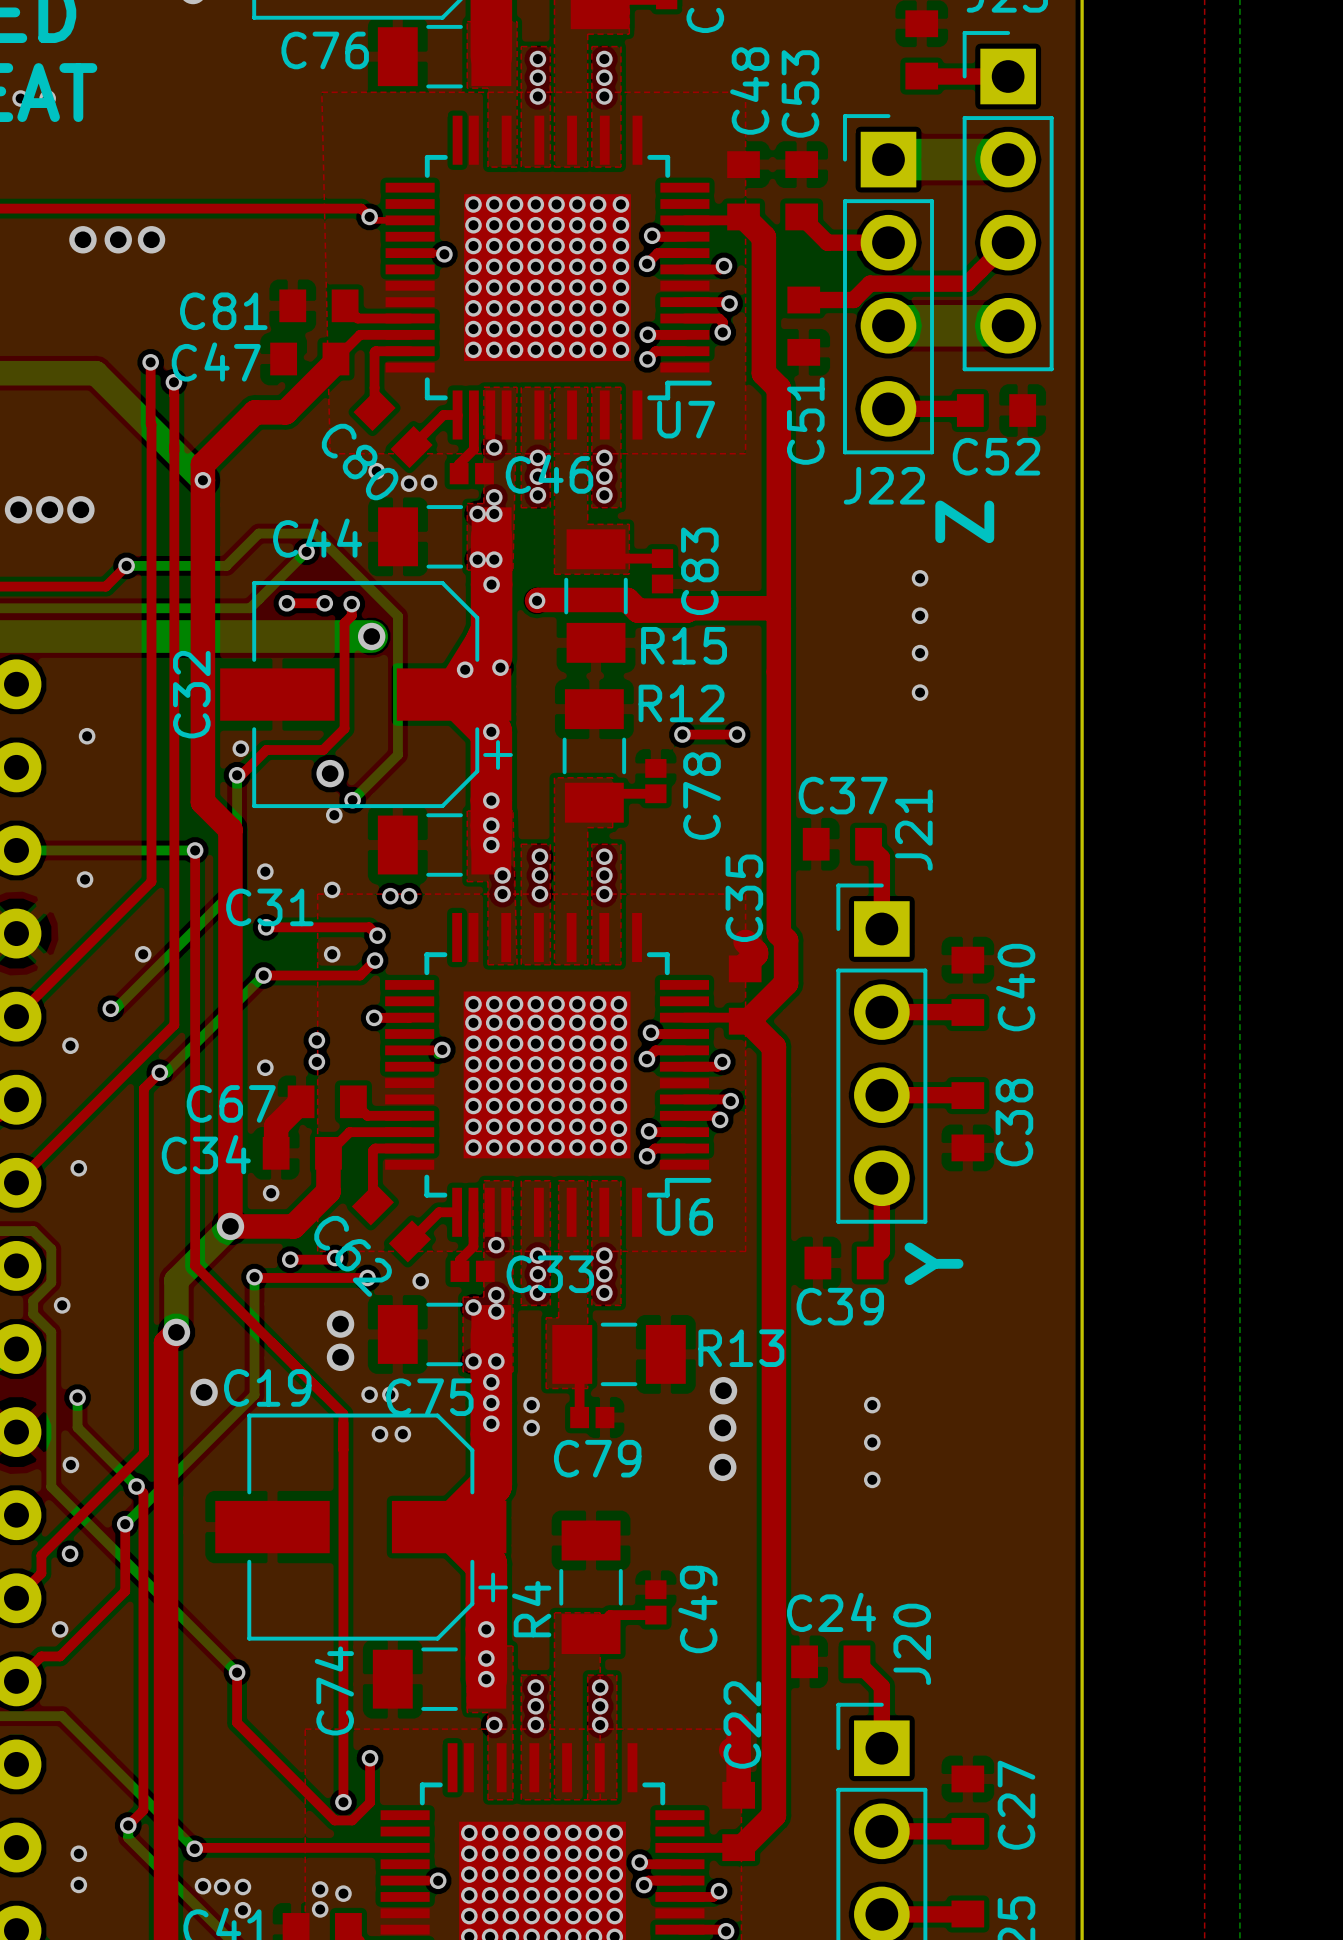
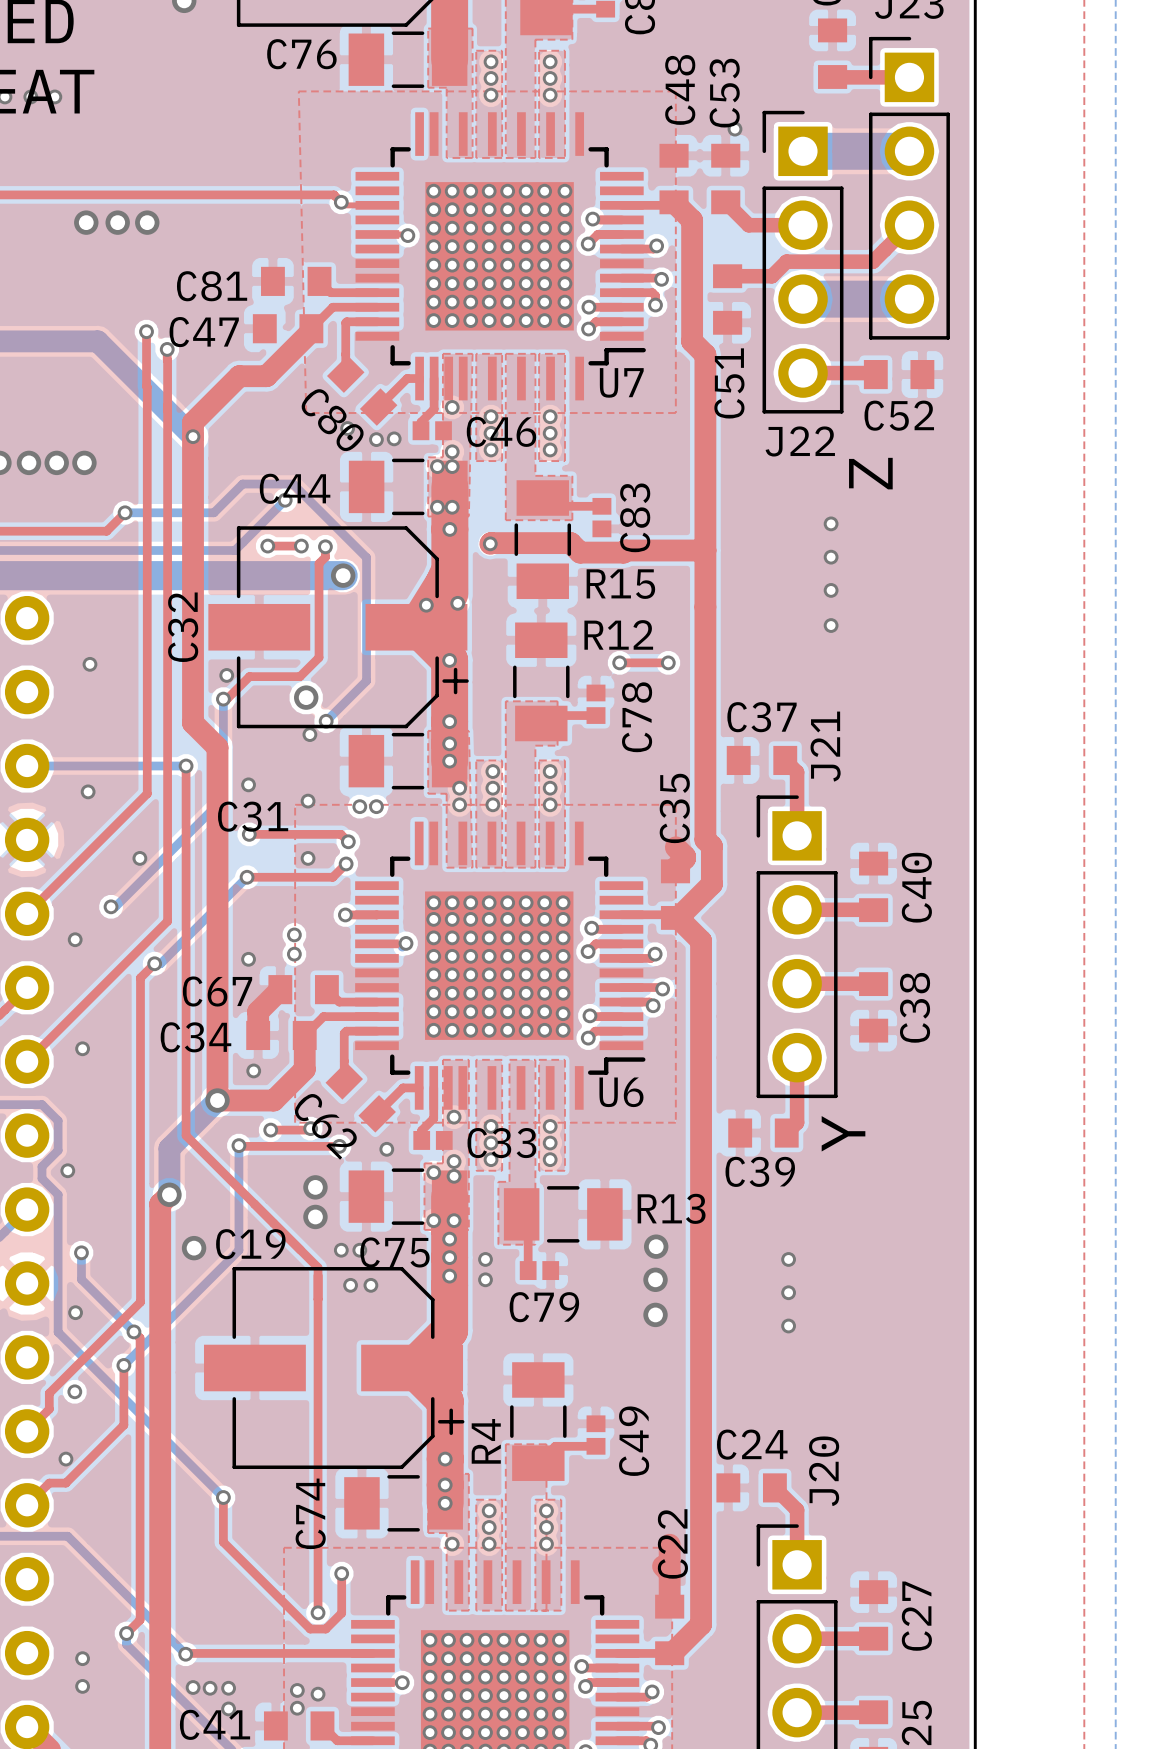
via: none -> (734, 129)

